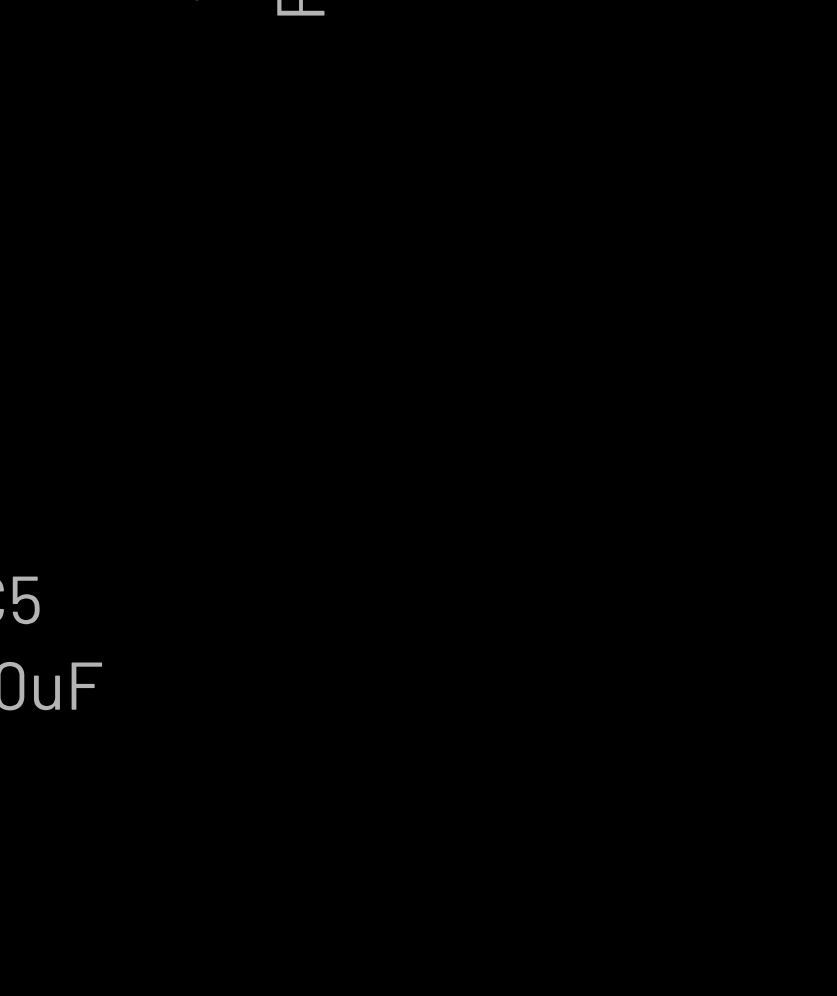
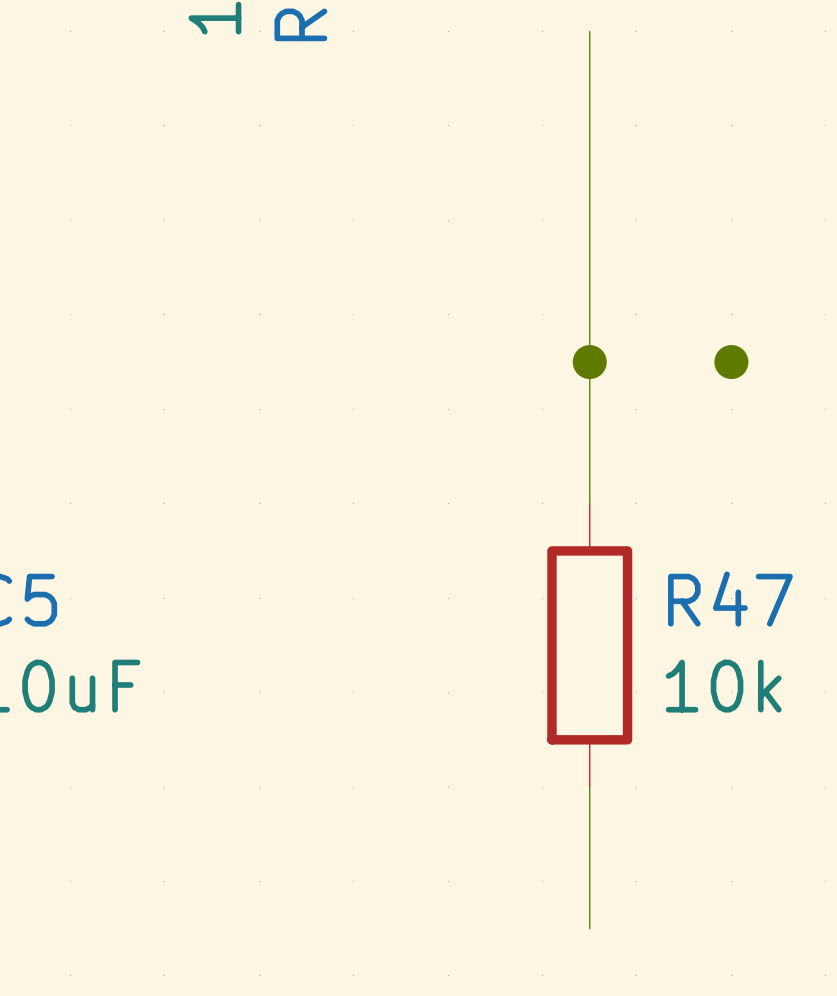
wire: none -> (589, 31) (589, 503)
junction: none -> (589, 362)
junction: none -> (731, 362)
R47: none -> 10k (589, 645)
wire: none -> (589, 787) (589, 928)

